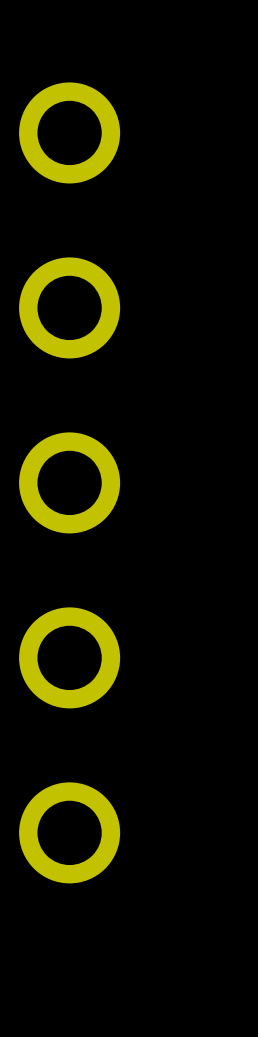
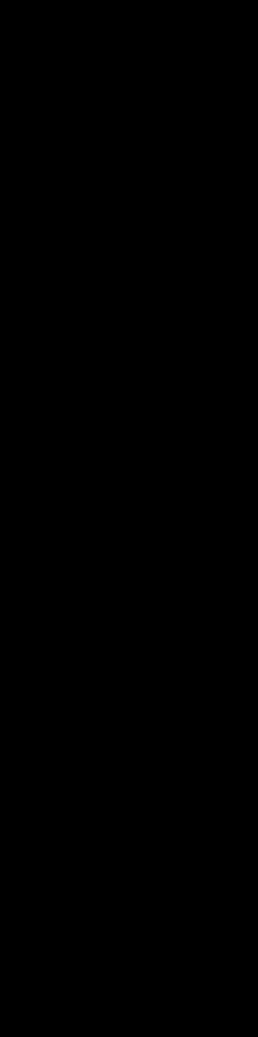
part: (69, 482) -> none

